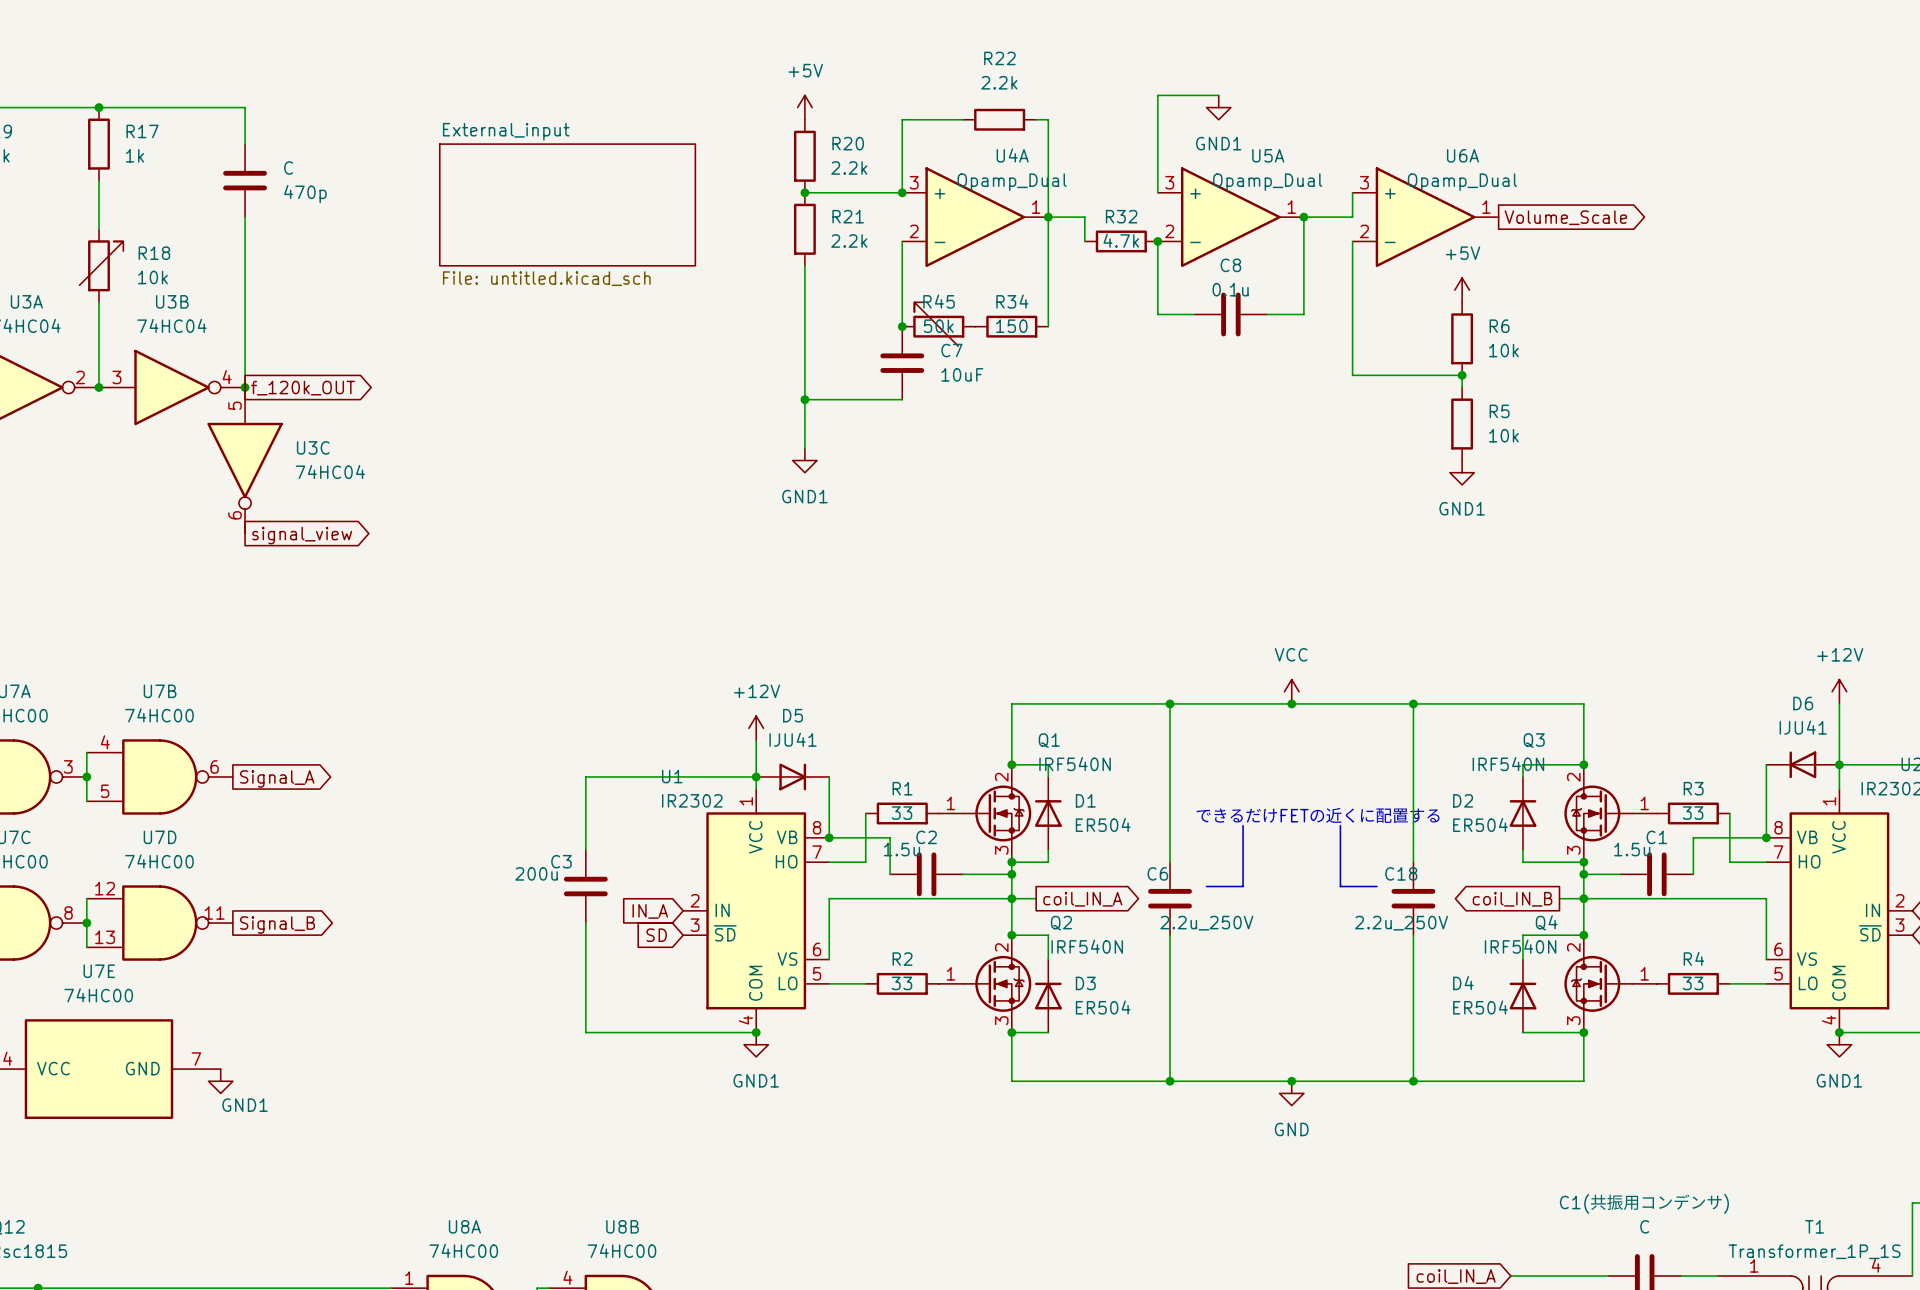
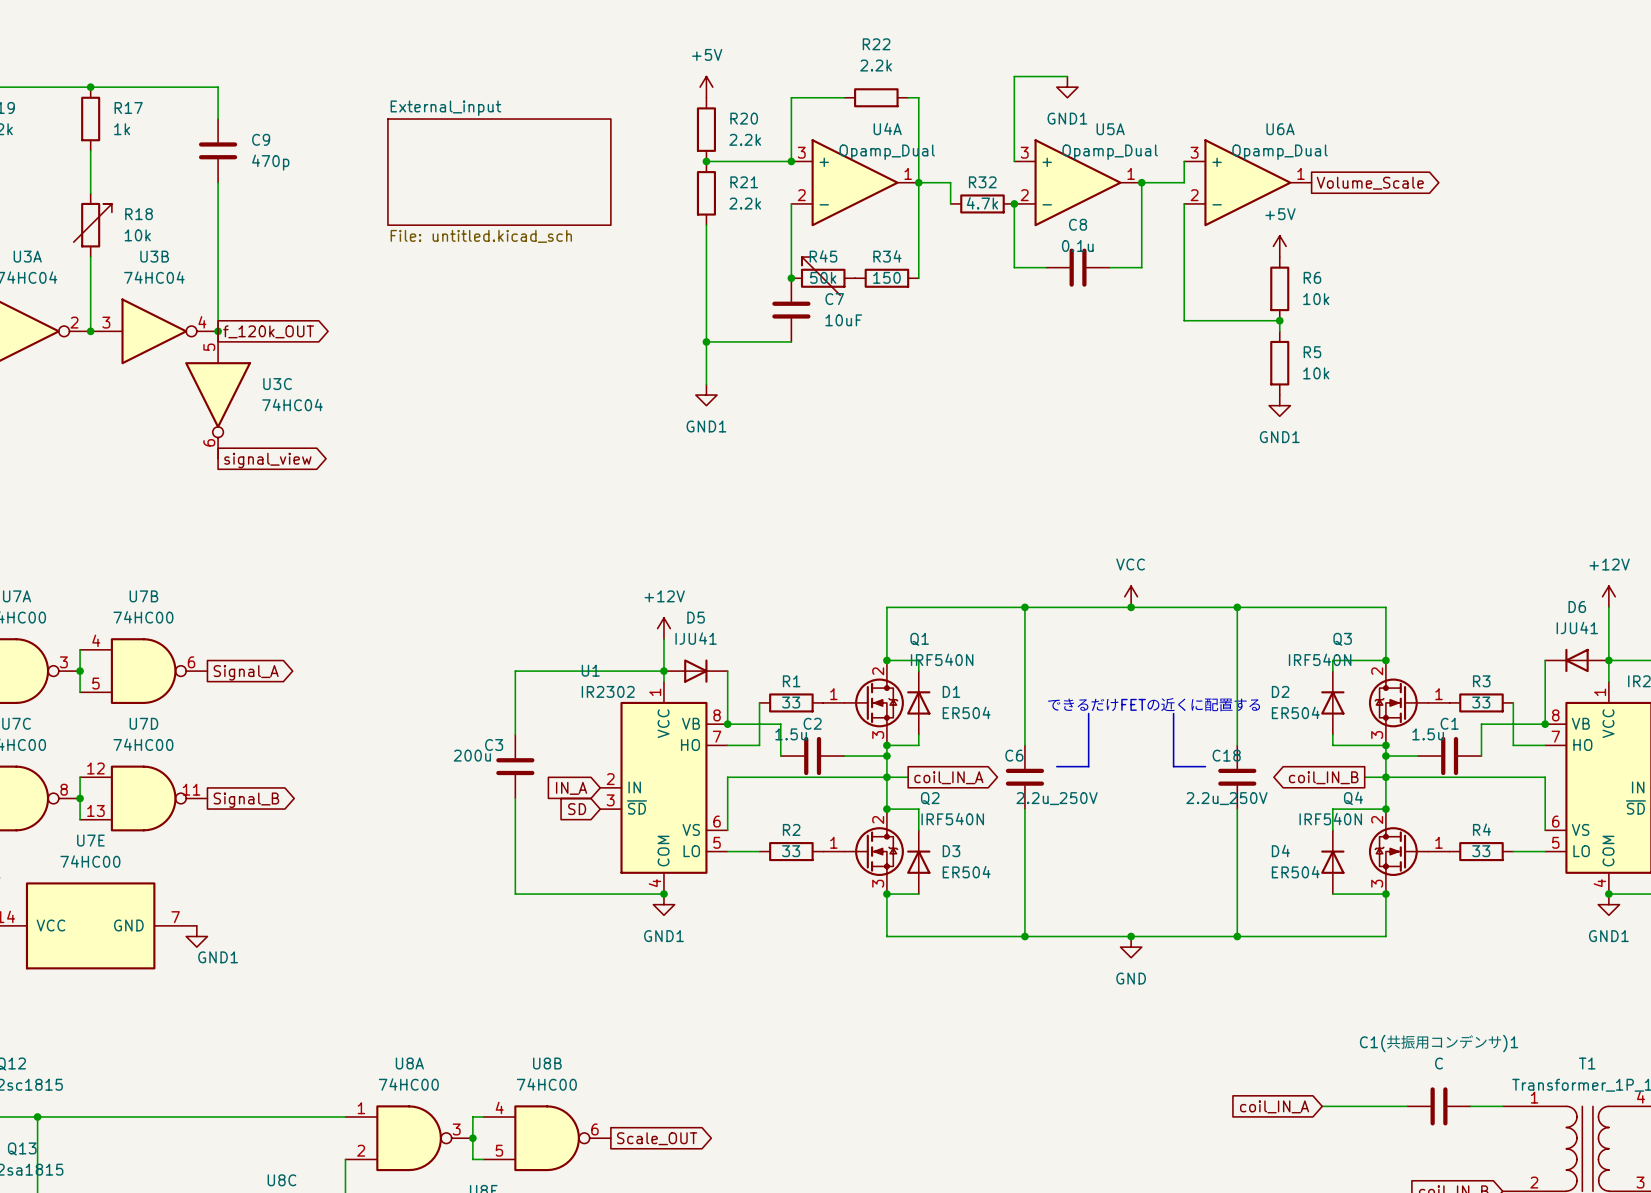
C name: C (288, 167) -> C9 (261, 139)
C1(共振用コンデンサ) name: C1(共振用コンデンサ) (1644, 1203) -> C1(共振用コンデンサ)1 (1439, 1043)

